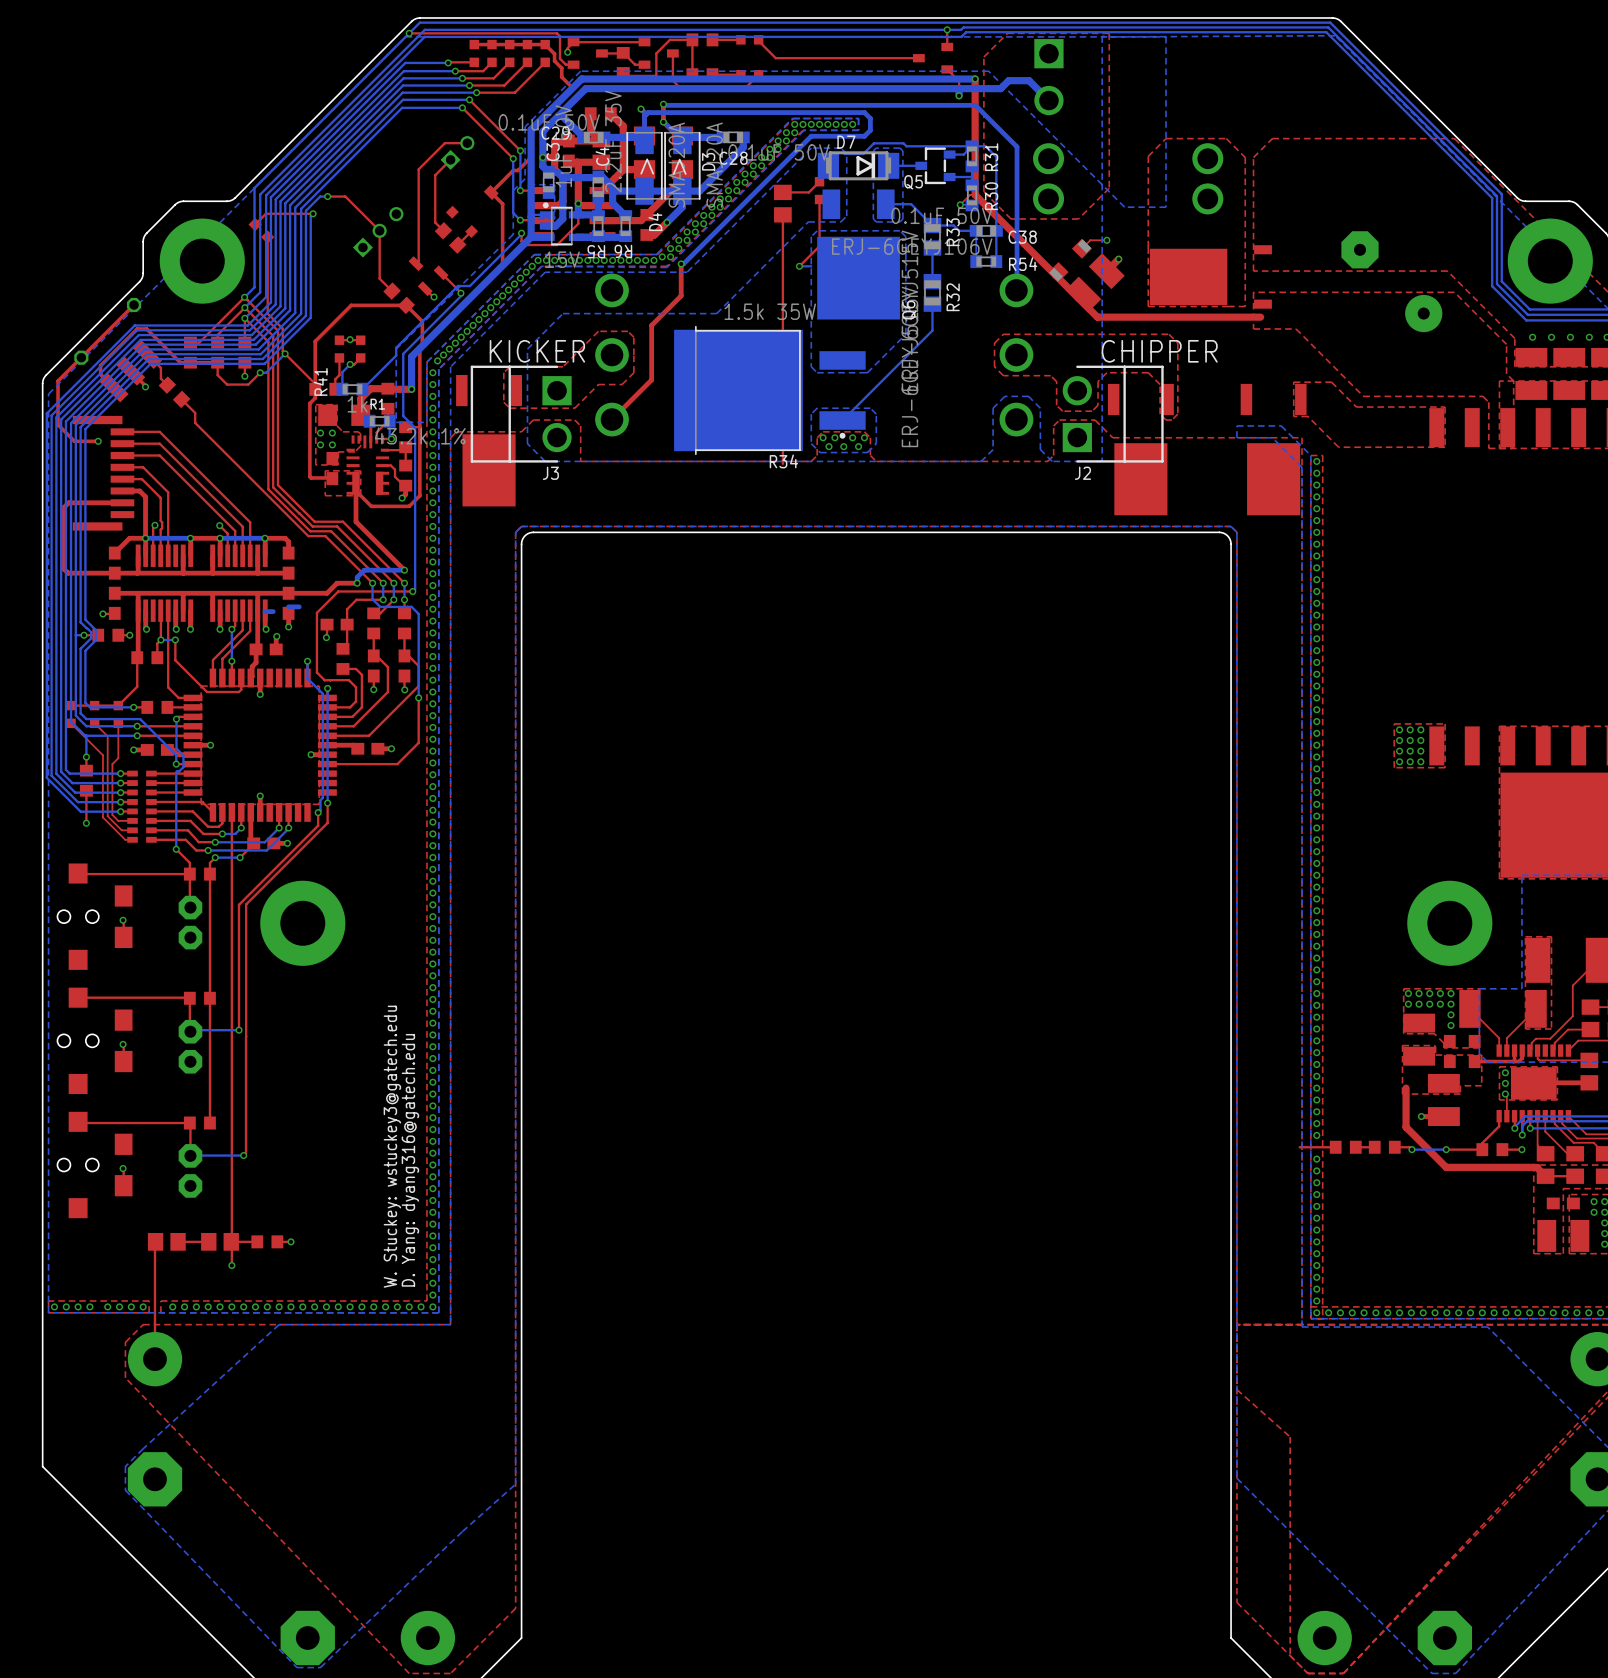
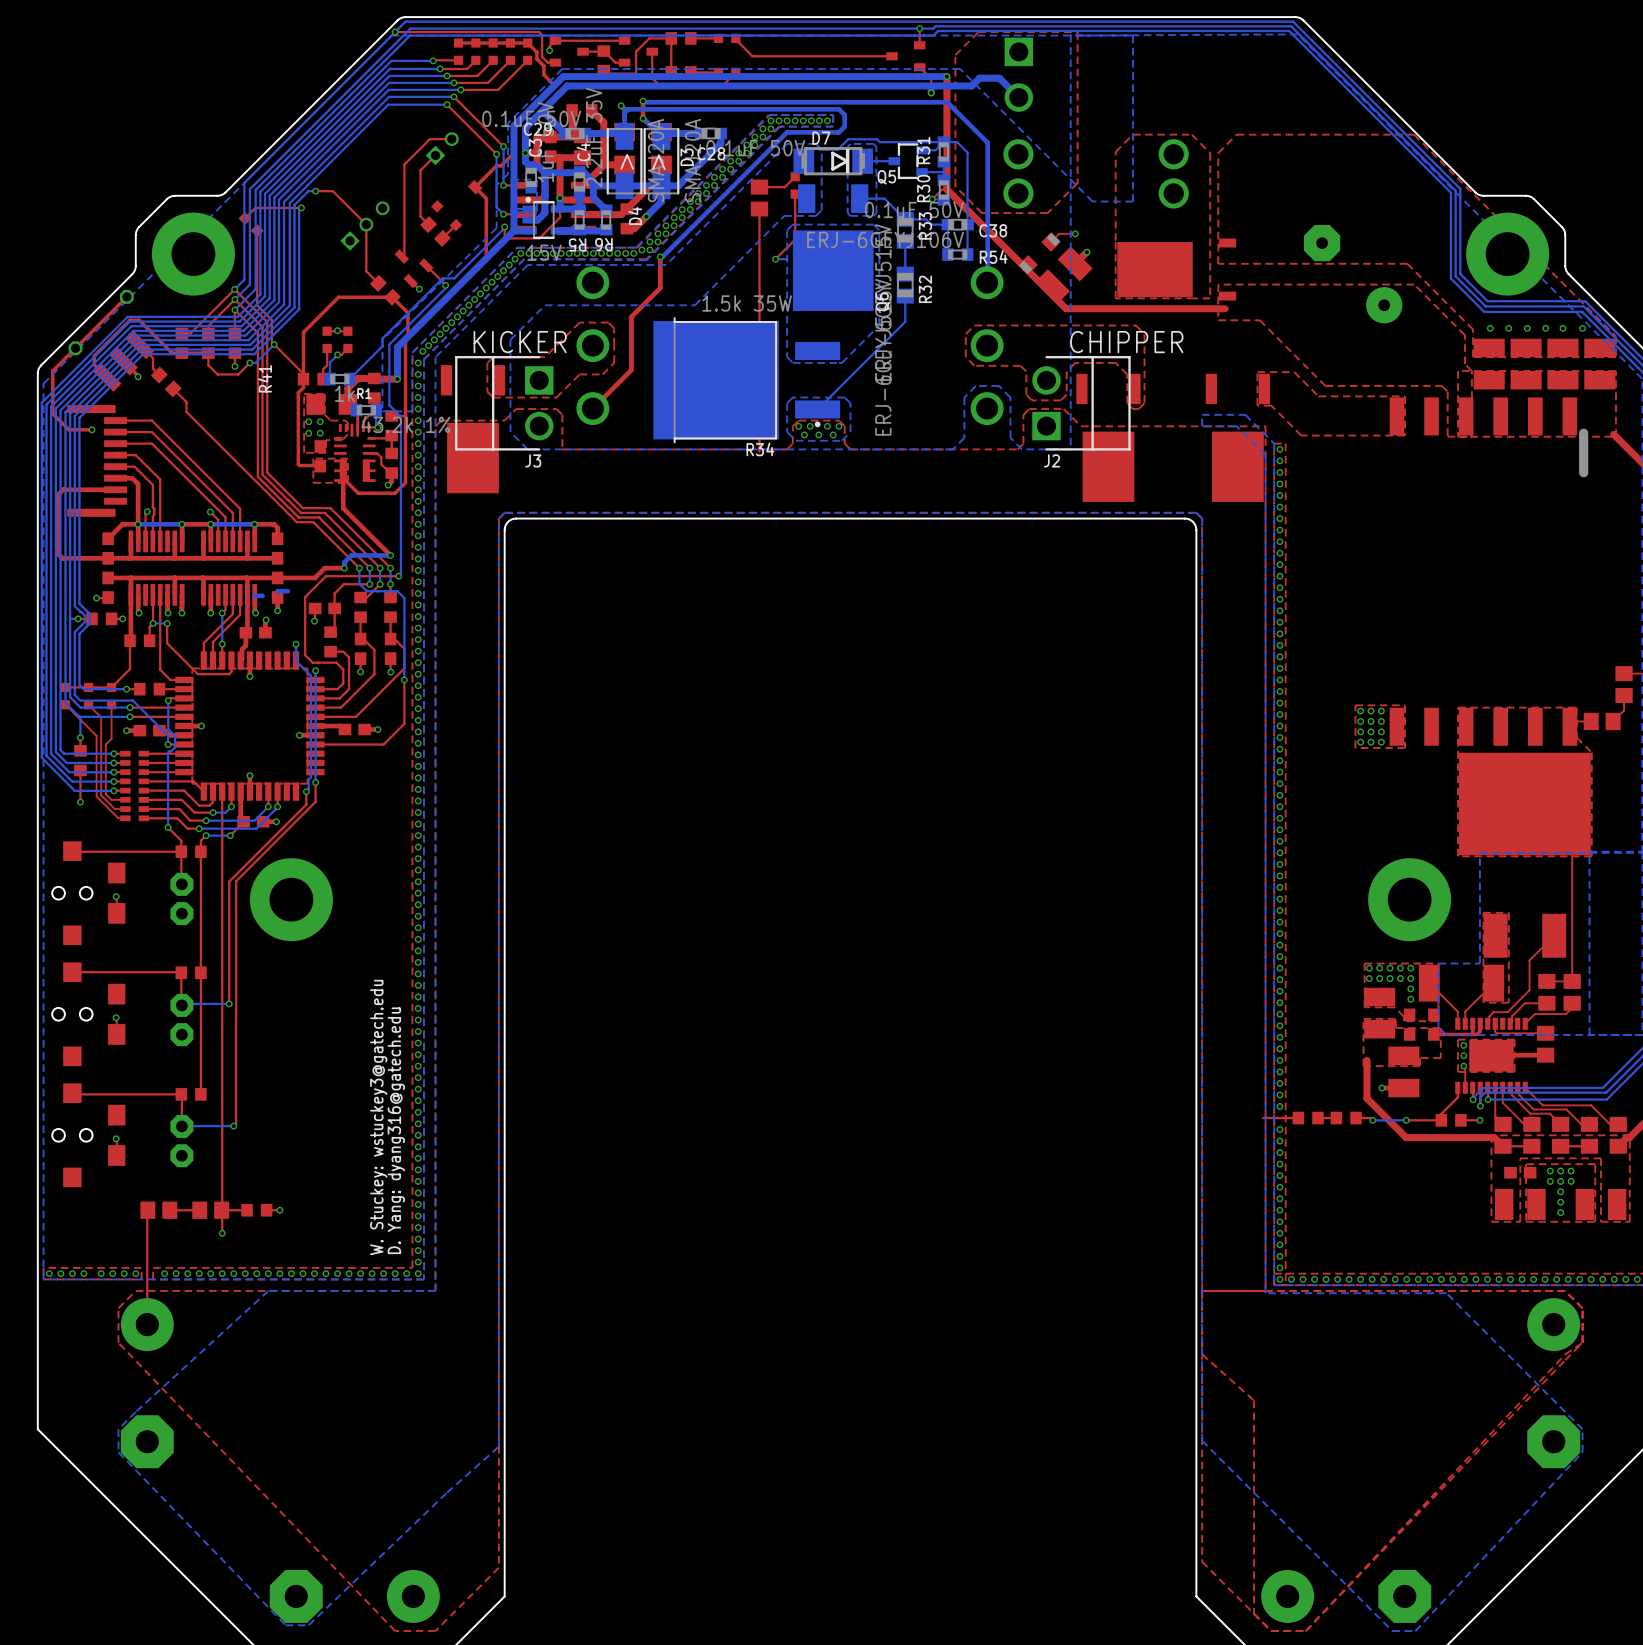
R31 name position: R31 (991, 157) -> R31 (923, 150)
R30 name position: R30 (991, 196) -> R30 (923, 188)
R41 name position: R41 (320, 381) -> R41 (265, 378)

